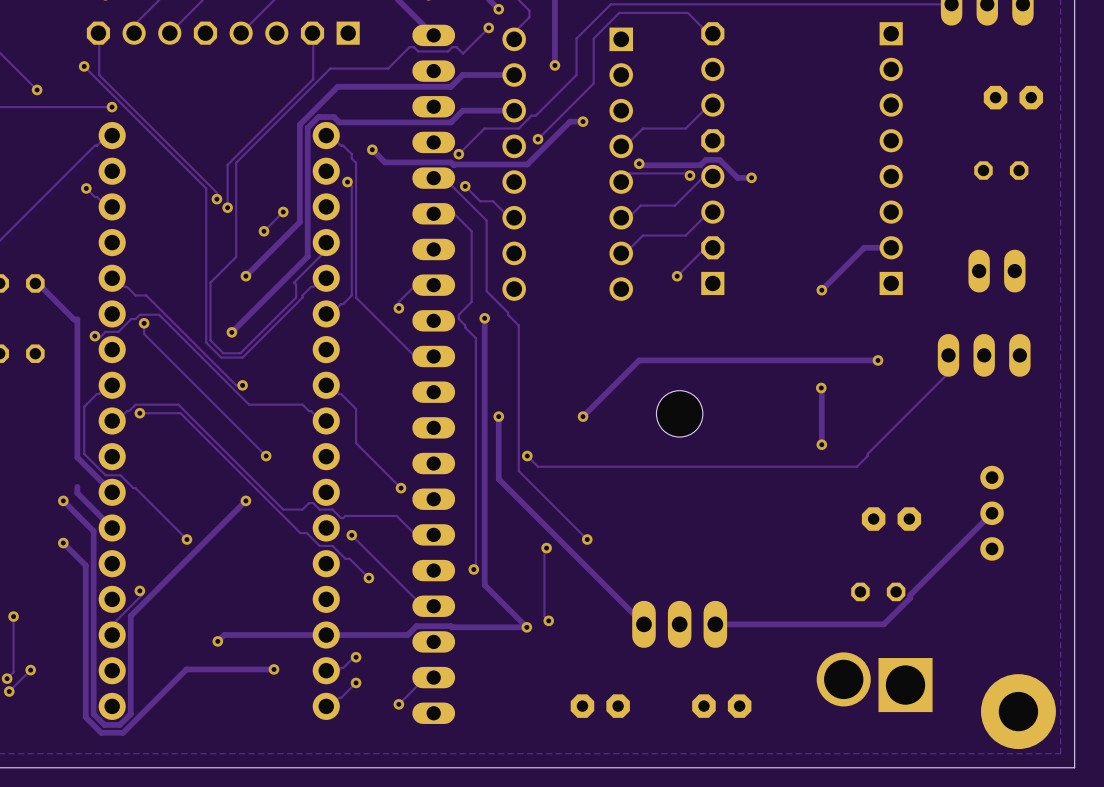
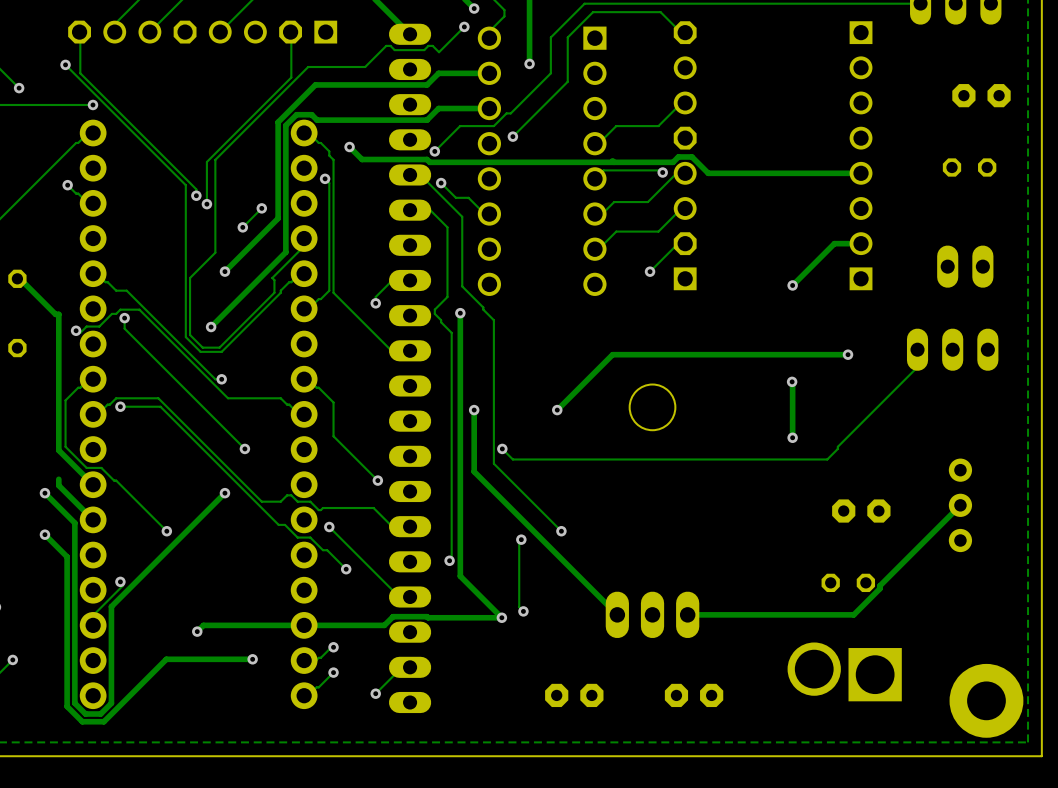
track: (583, 121) (570, 121) (527, 164) (453, 165) -> (614, 162) (429, 162)
via: (583, 121) -> none
via: (639, 163) -> none
track: (736, 176) (751, 177) -> (708, 173) (861, 173)
via: (751, 177) -> none

